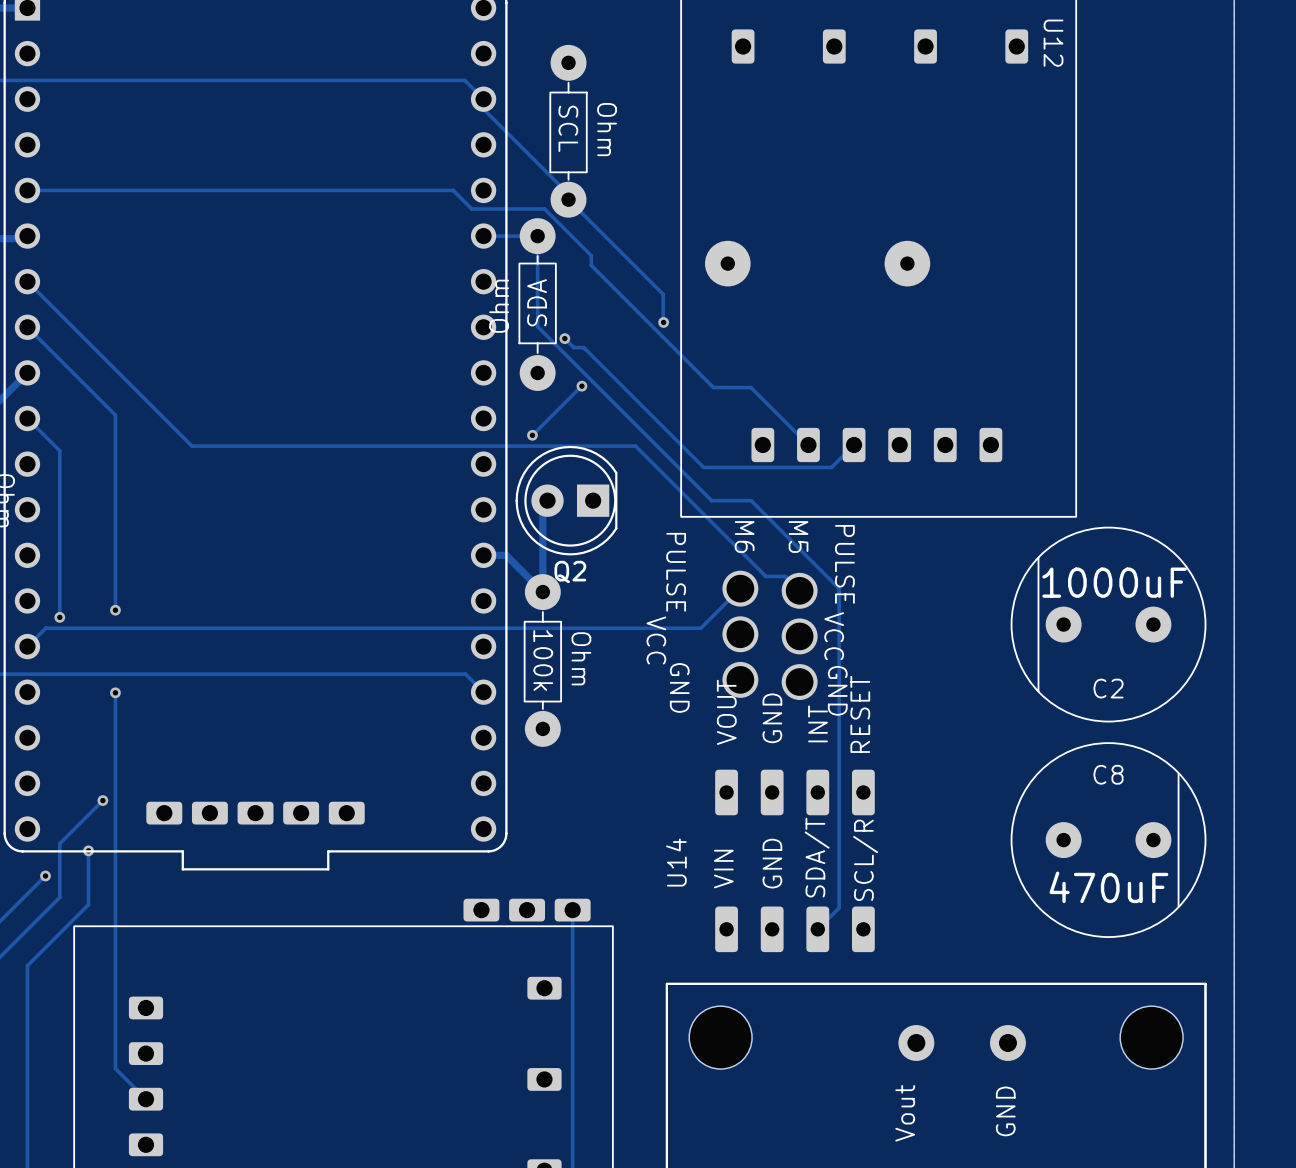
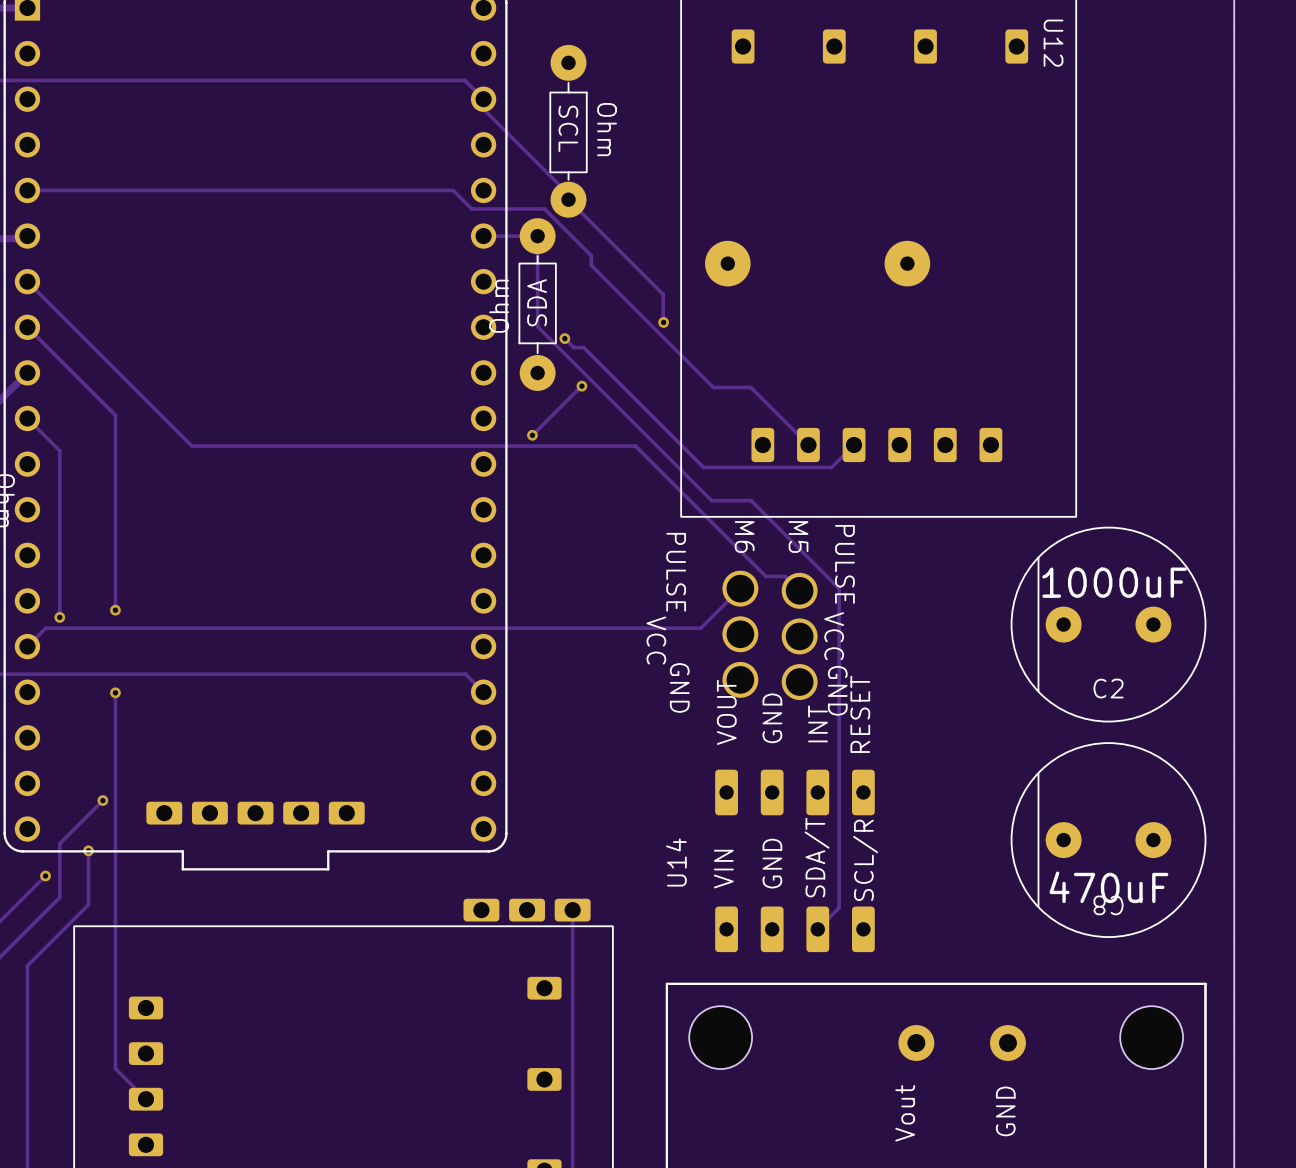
Q2: (566, 500) -> none
track: (542, 505) (542, 592) (506, 555) (483, 555) -> none
part: (542, 660) -> none
C8 rotation: 0° (1108, 840) -> 180° (1108, 840)

